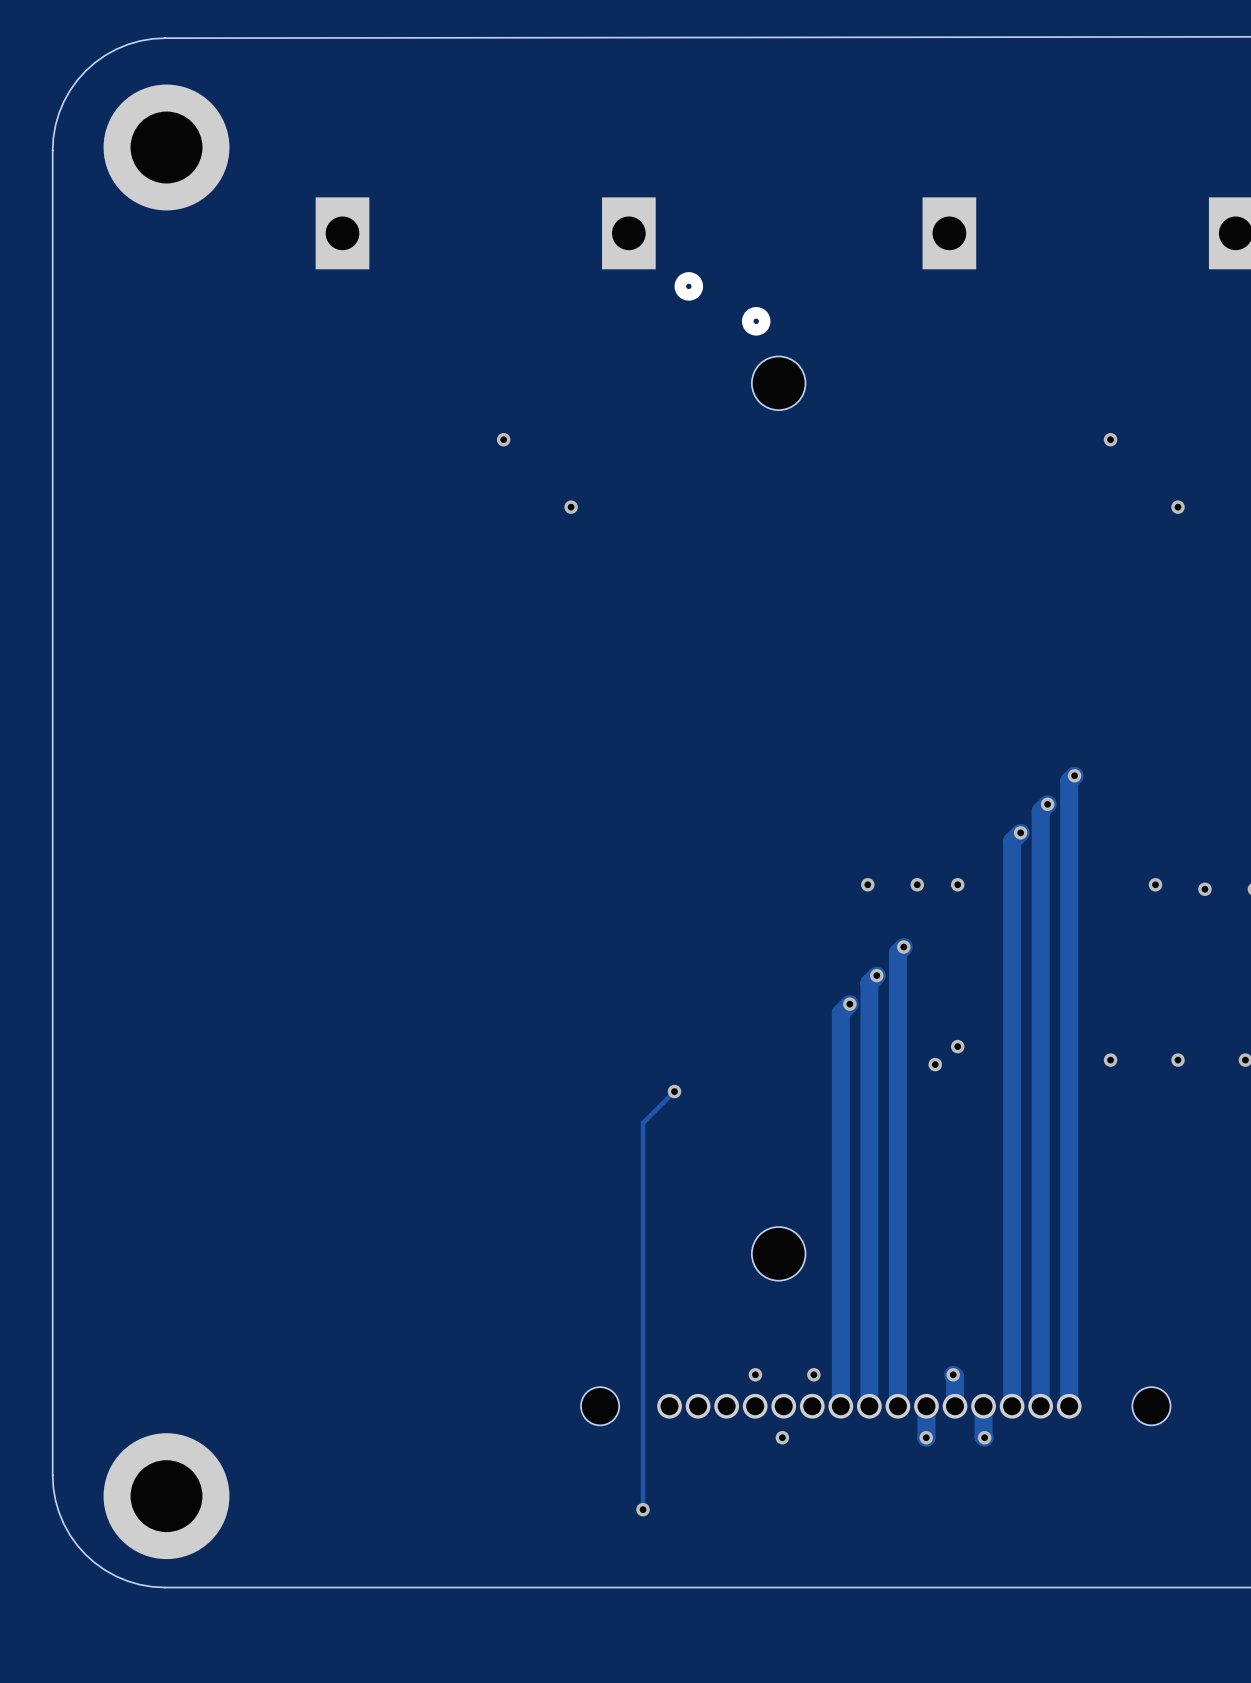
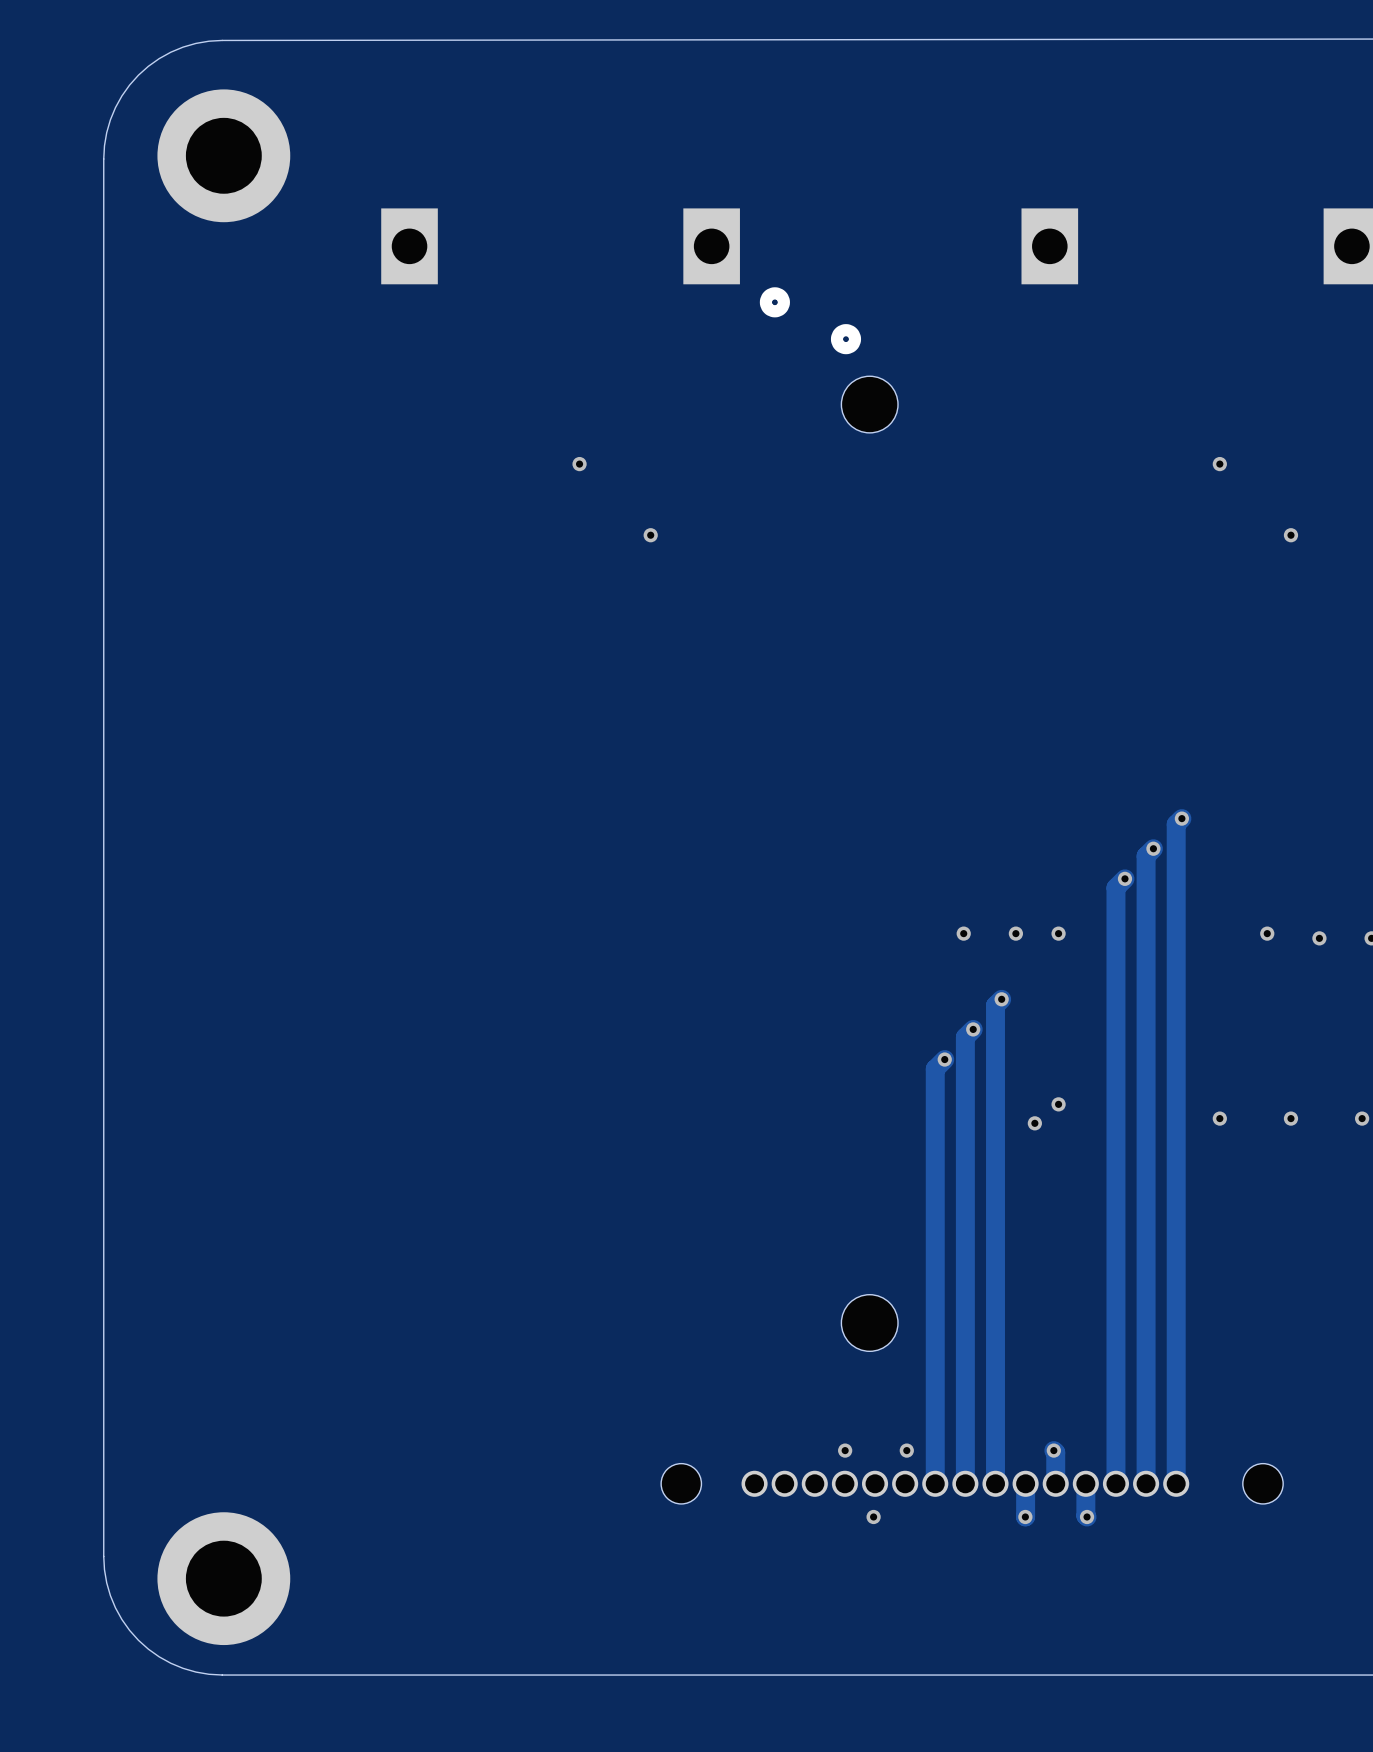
track: (674, 1091) (643, 1123) (643, 1509) -> none
via: (674, 1091) -> none
via: (643, 1509) -> none

